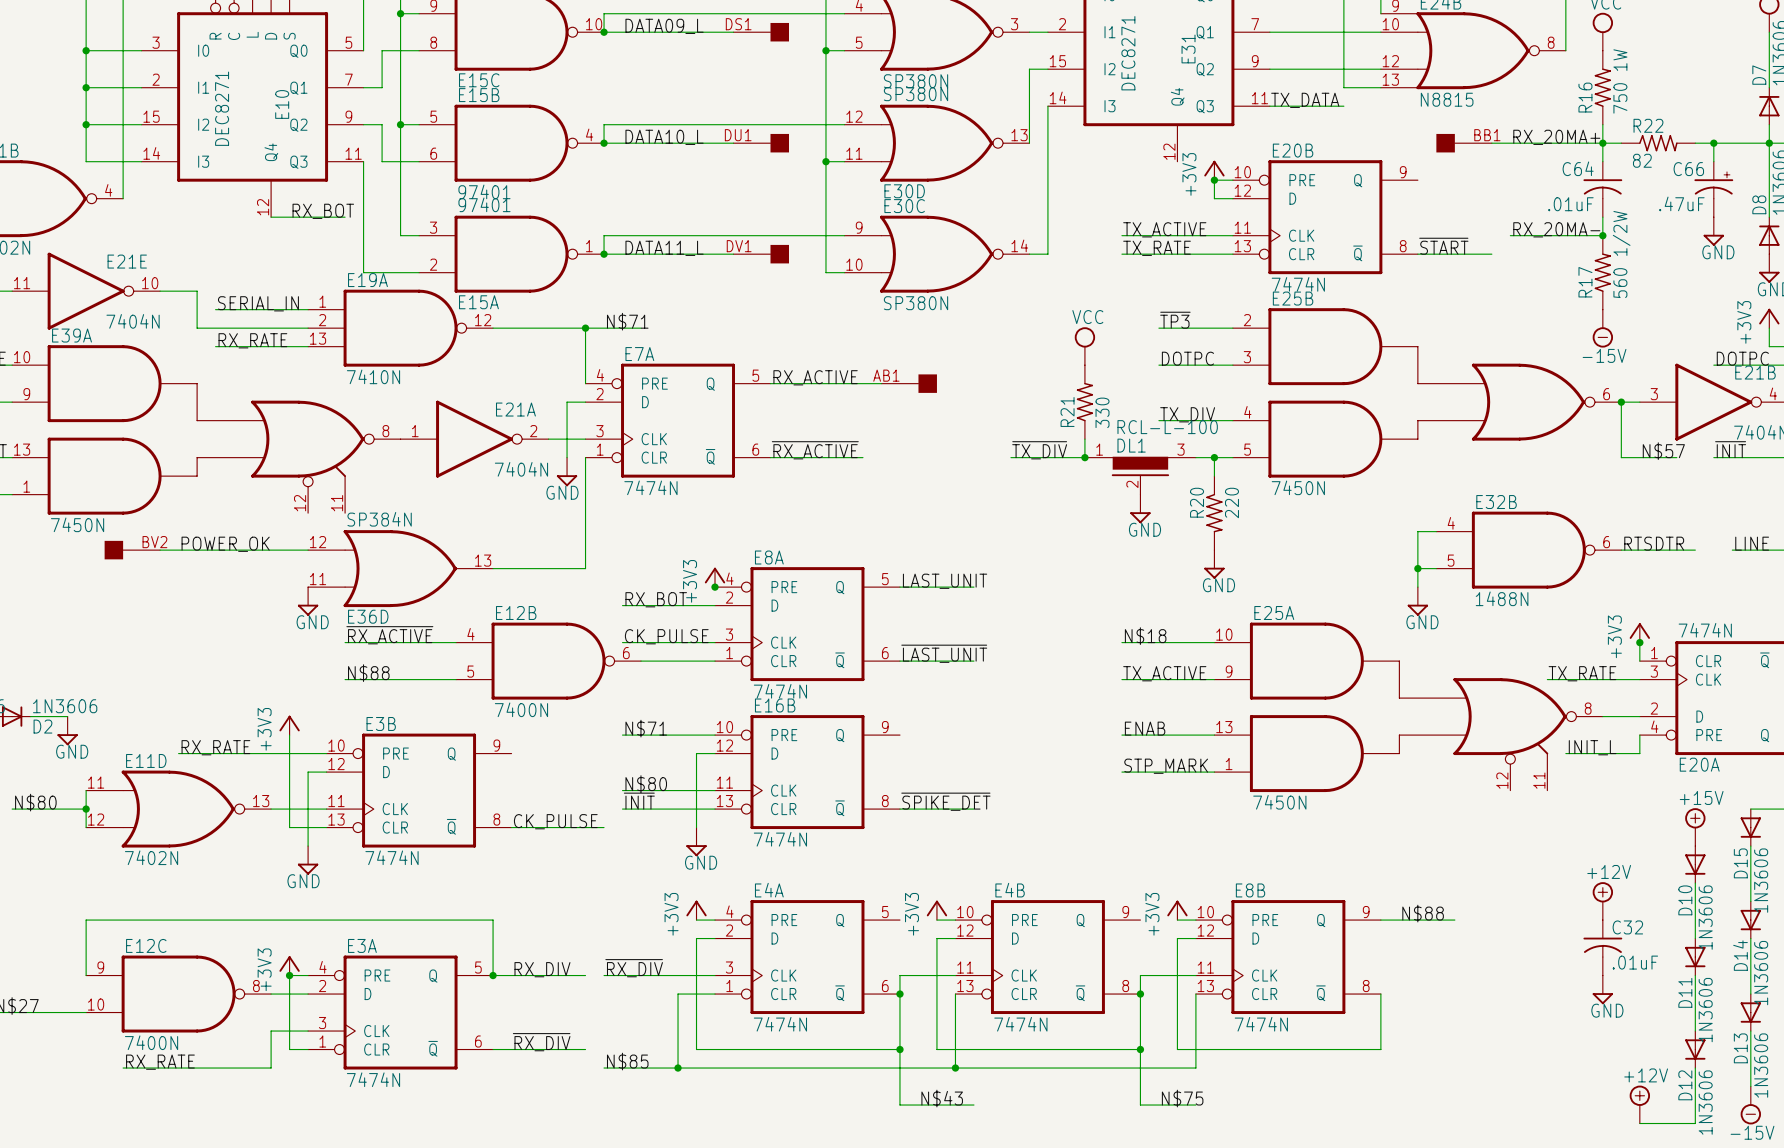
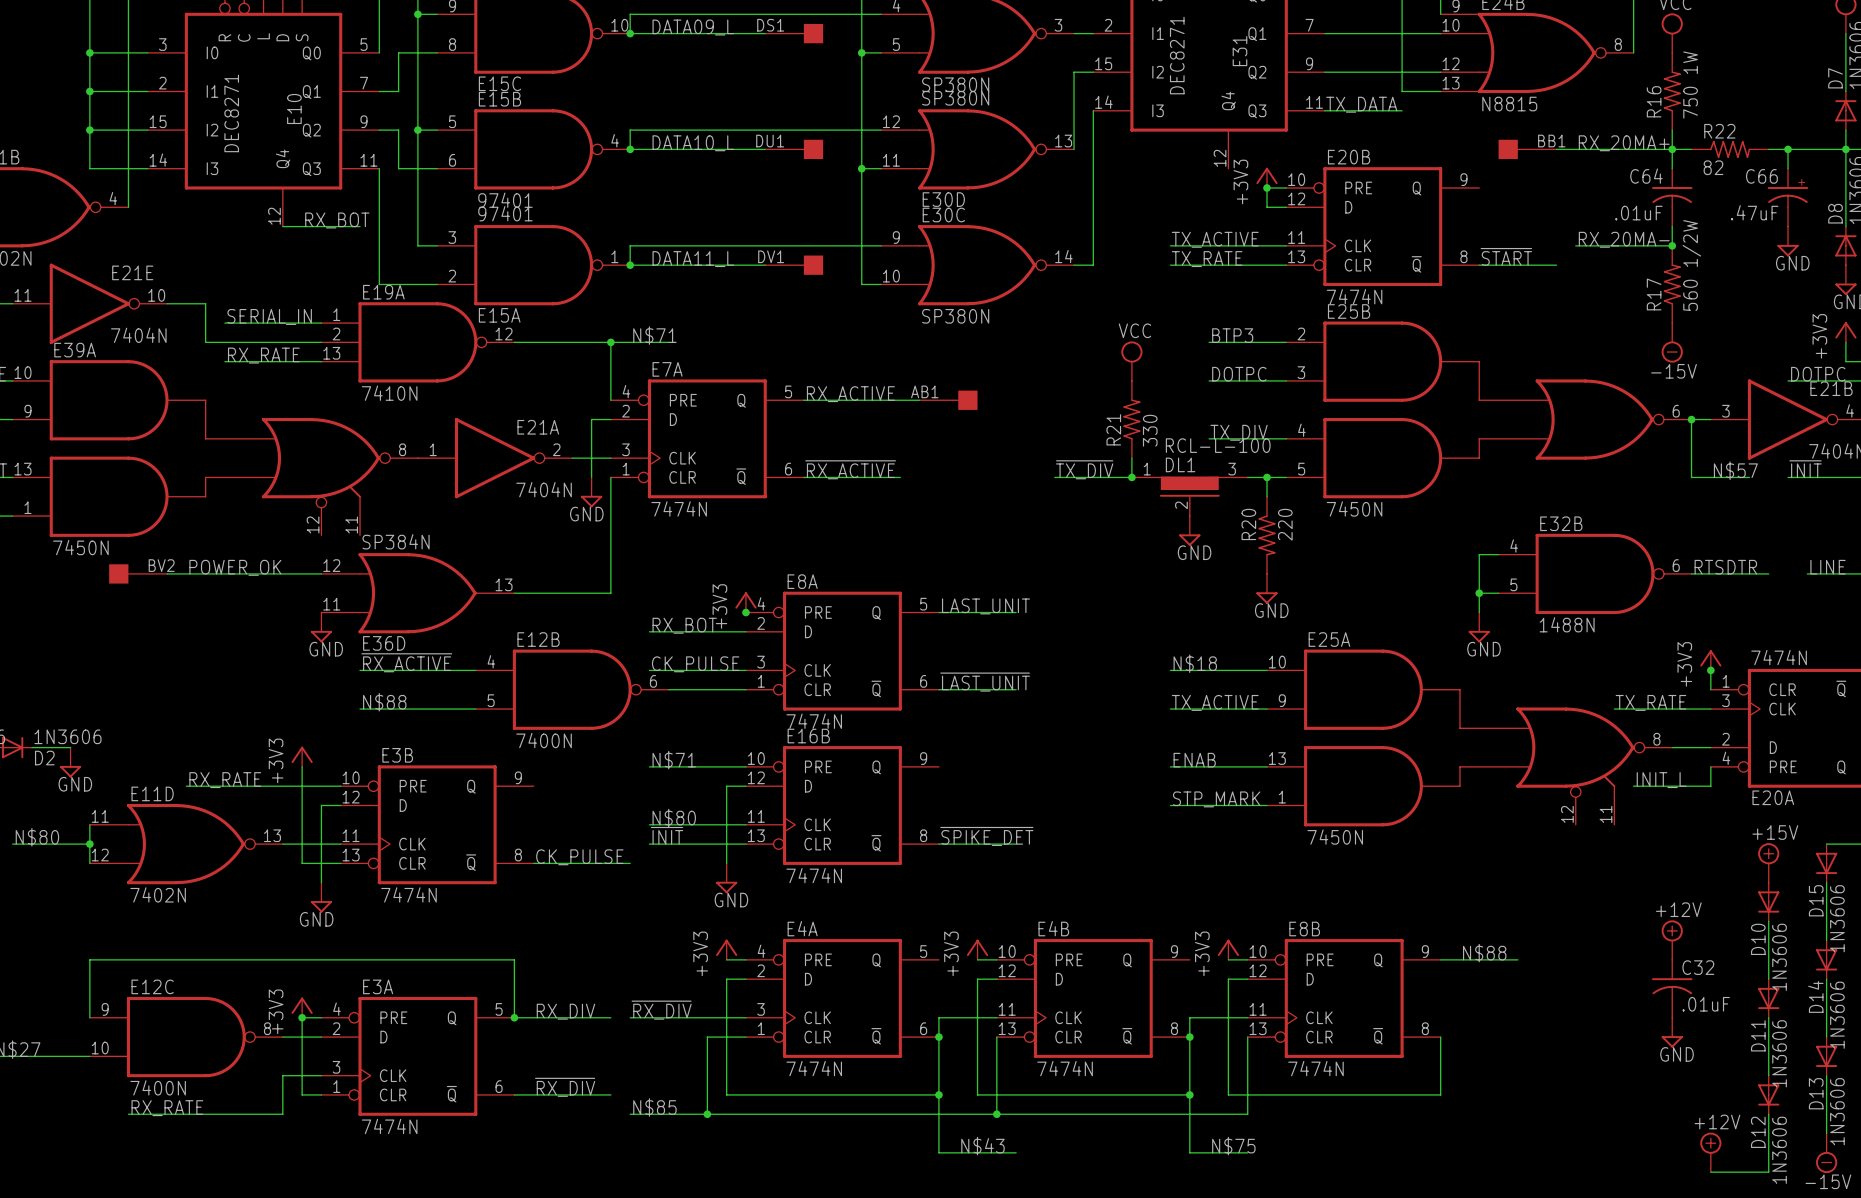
label: ~{TP3} (1175, 320) -> BTP3 (1232, 335)

